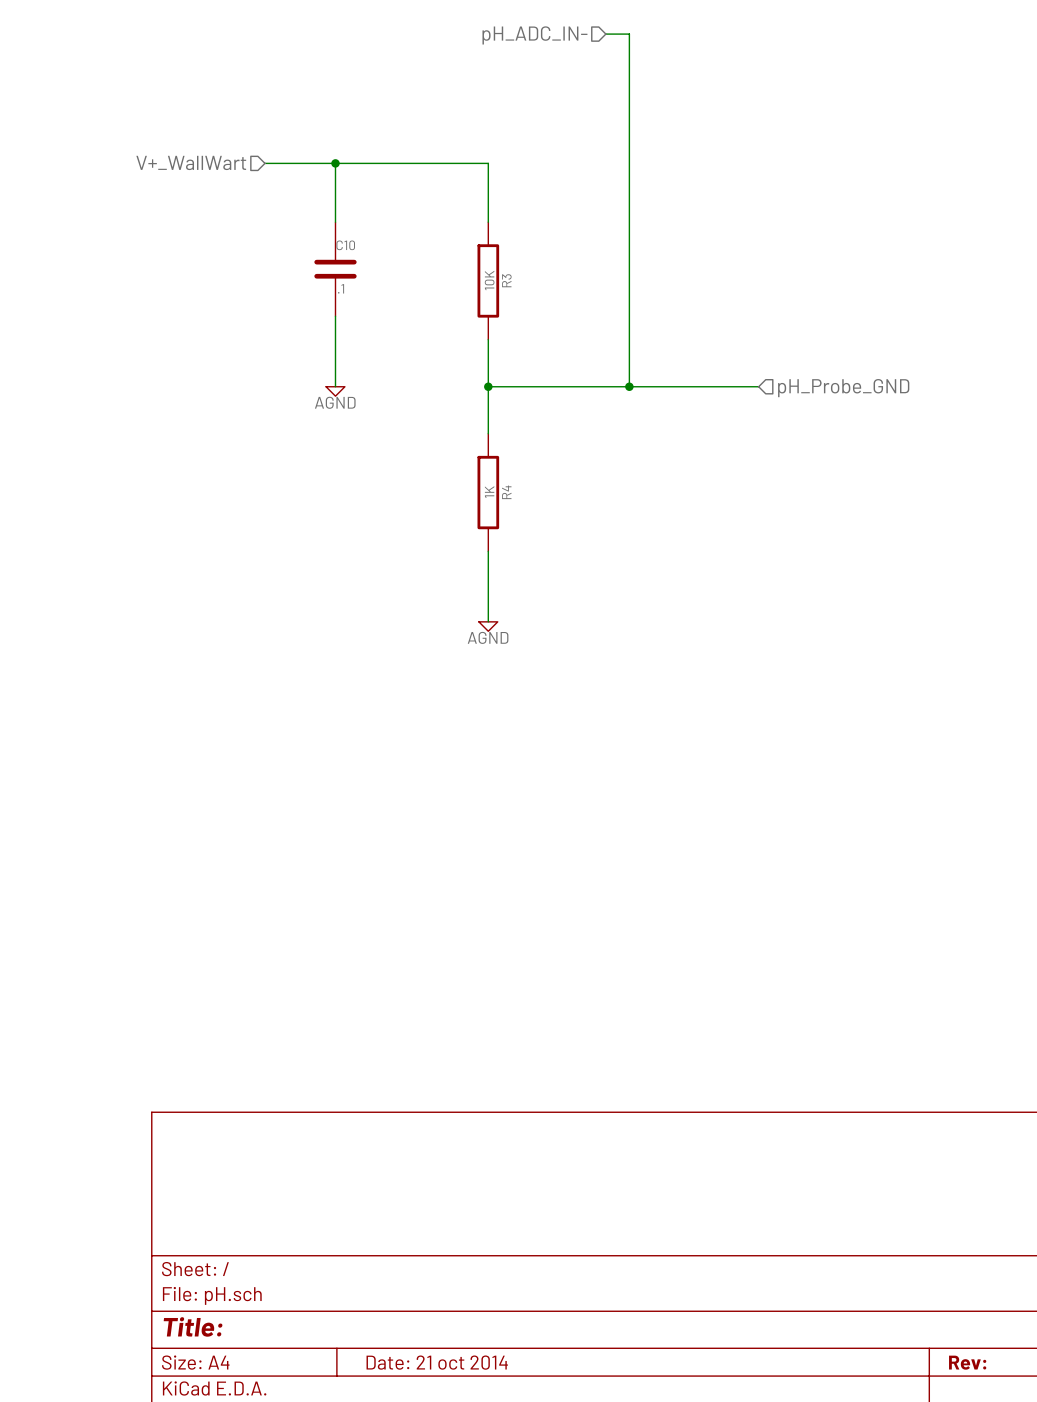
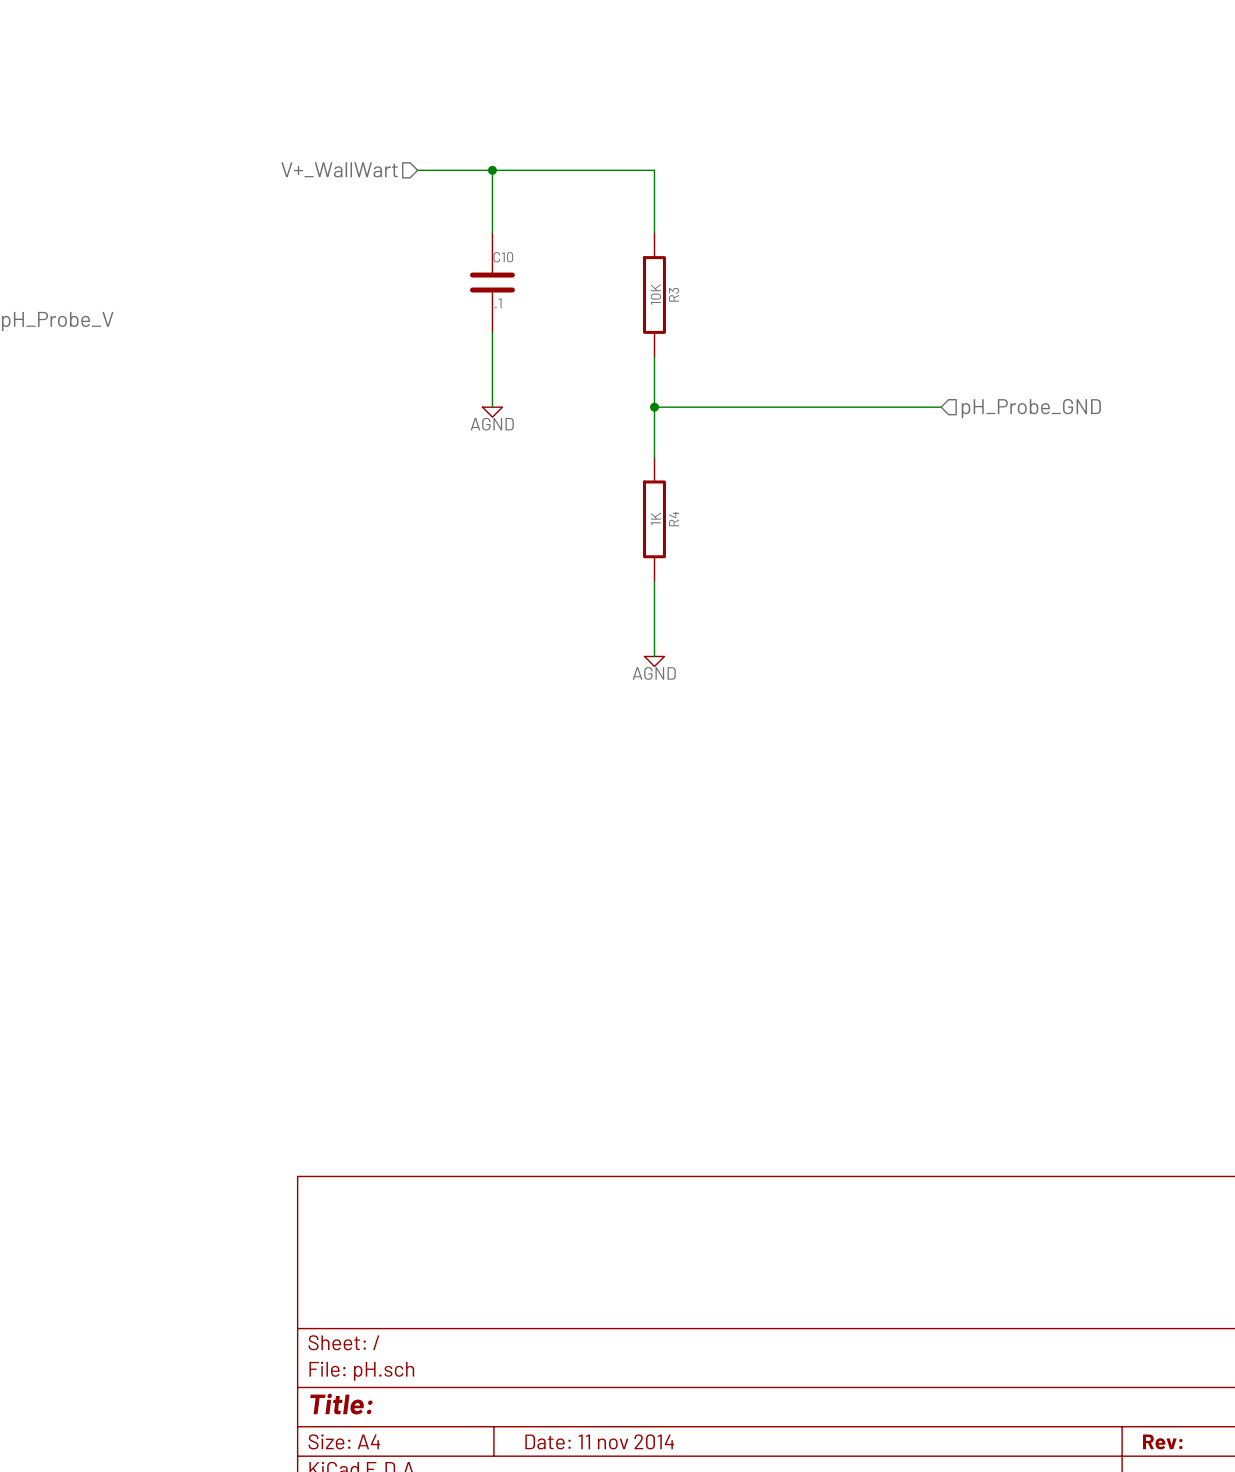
wire: (605, 34) (629, 34) (629, 386) -> none
hierarchical label: pH_ADC_IN- (534, 35) -> none
junction: (629, 386) -> none
title block: Date: 21 oct 2014 (437, 1362) -> Date: 11 nov 2014 (599, 1441)

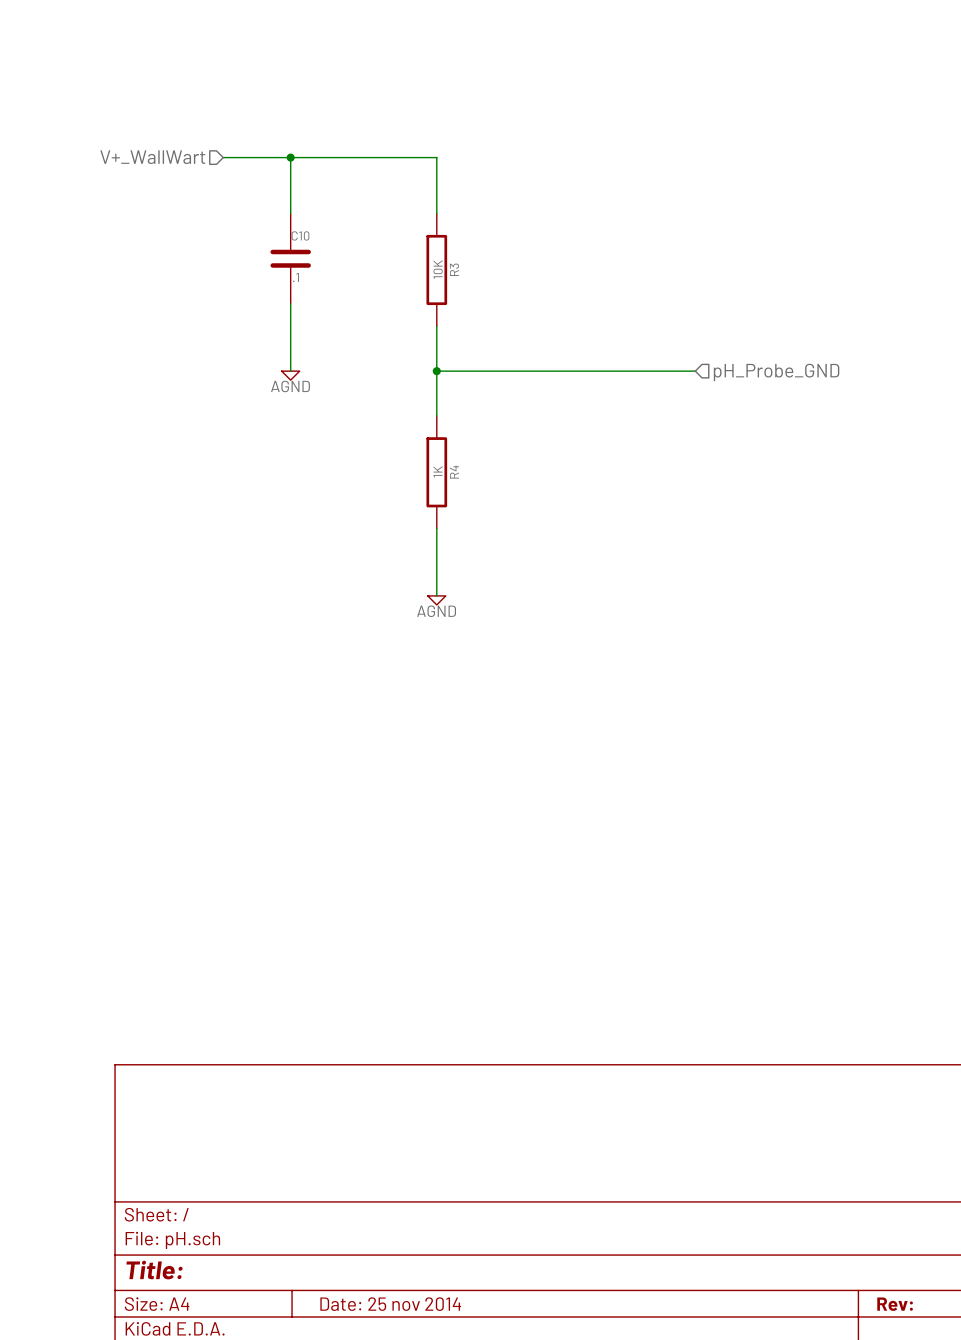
title block: Date: 11 nov 2014 (599, 1441) -> Date: 25 nov 2014 (390, 1304)

